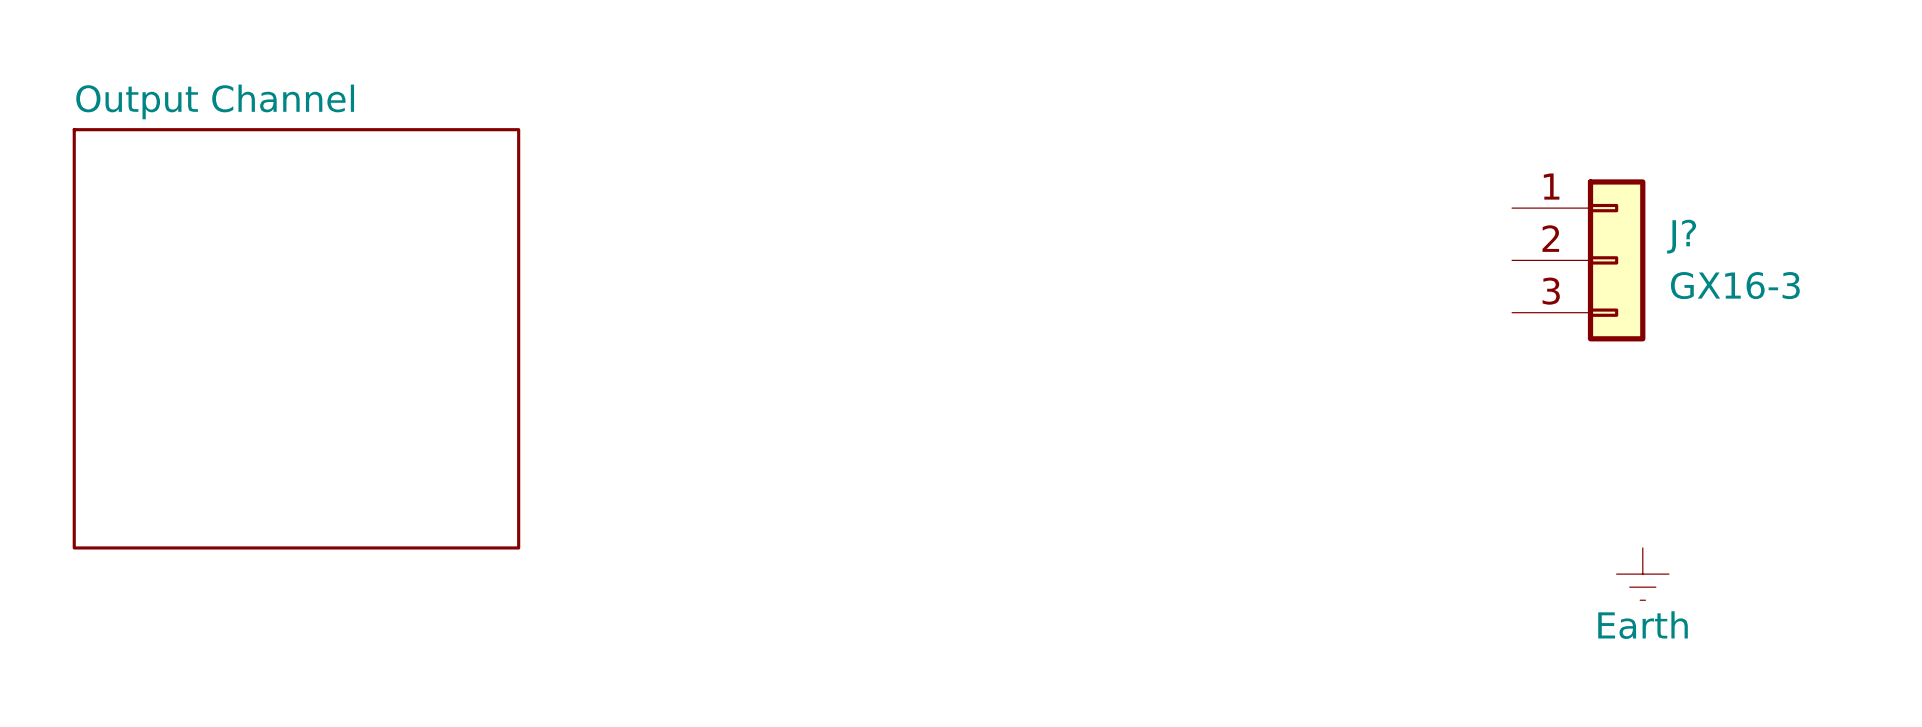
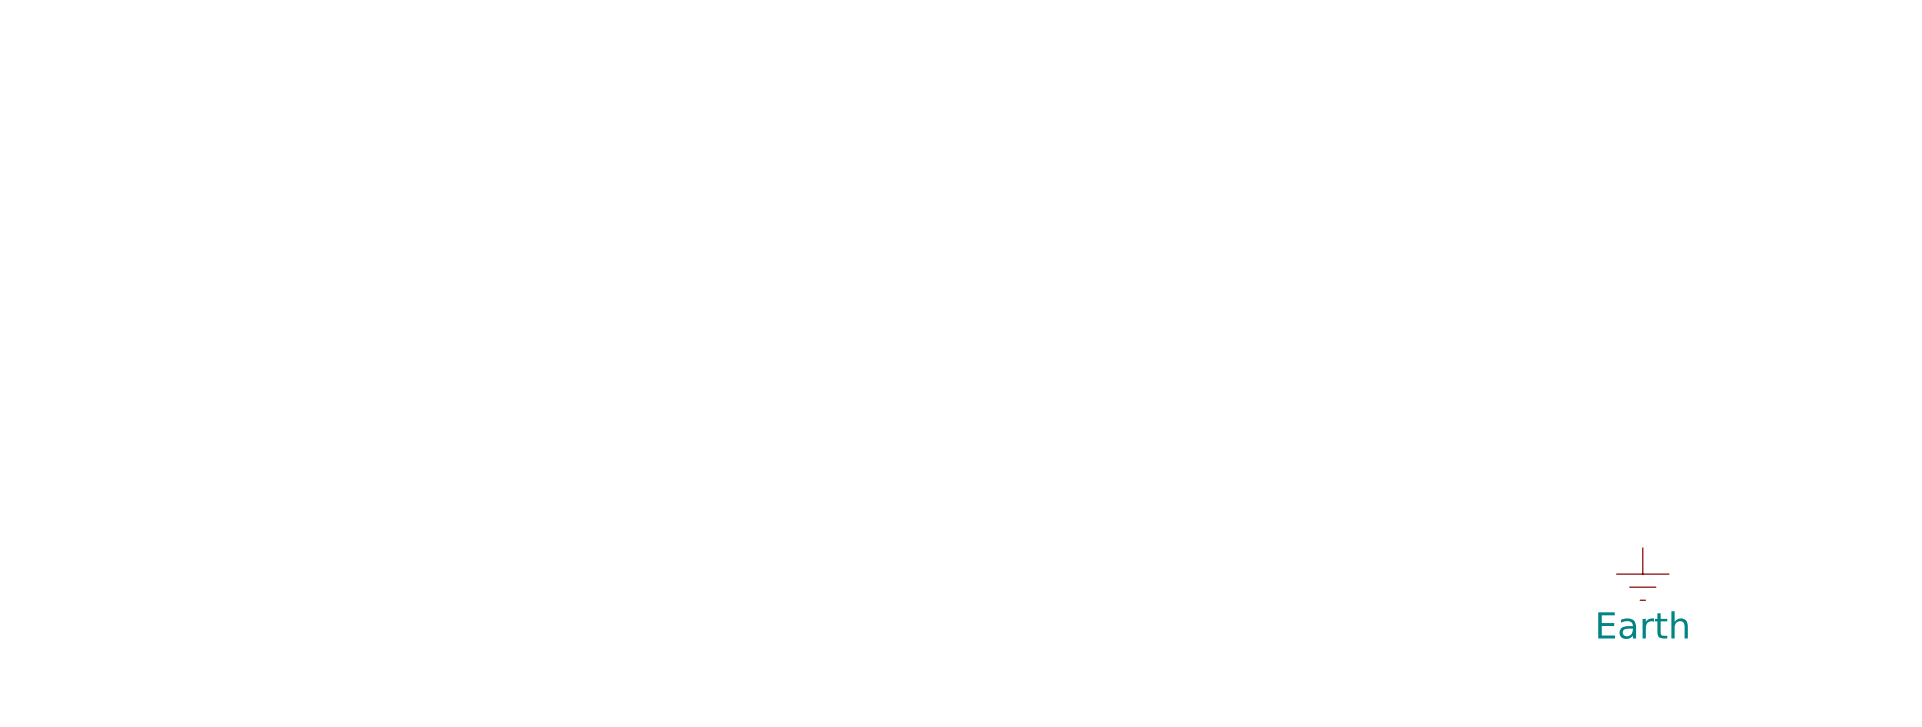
J?: GX16-3 (1578, 260) -> none
sheet Output Channel: (296, 338) -> none

